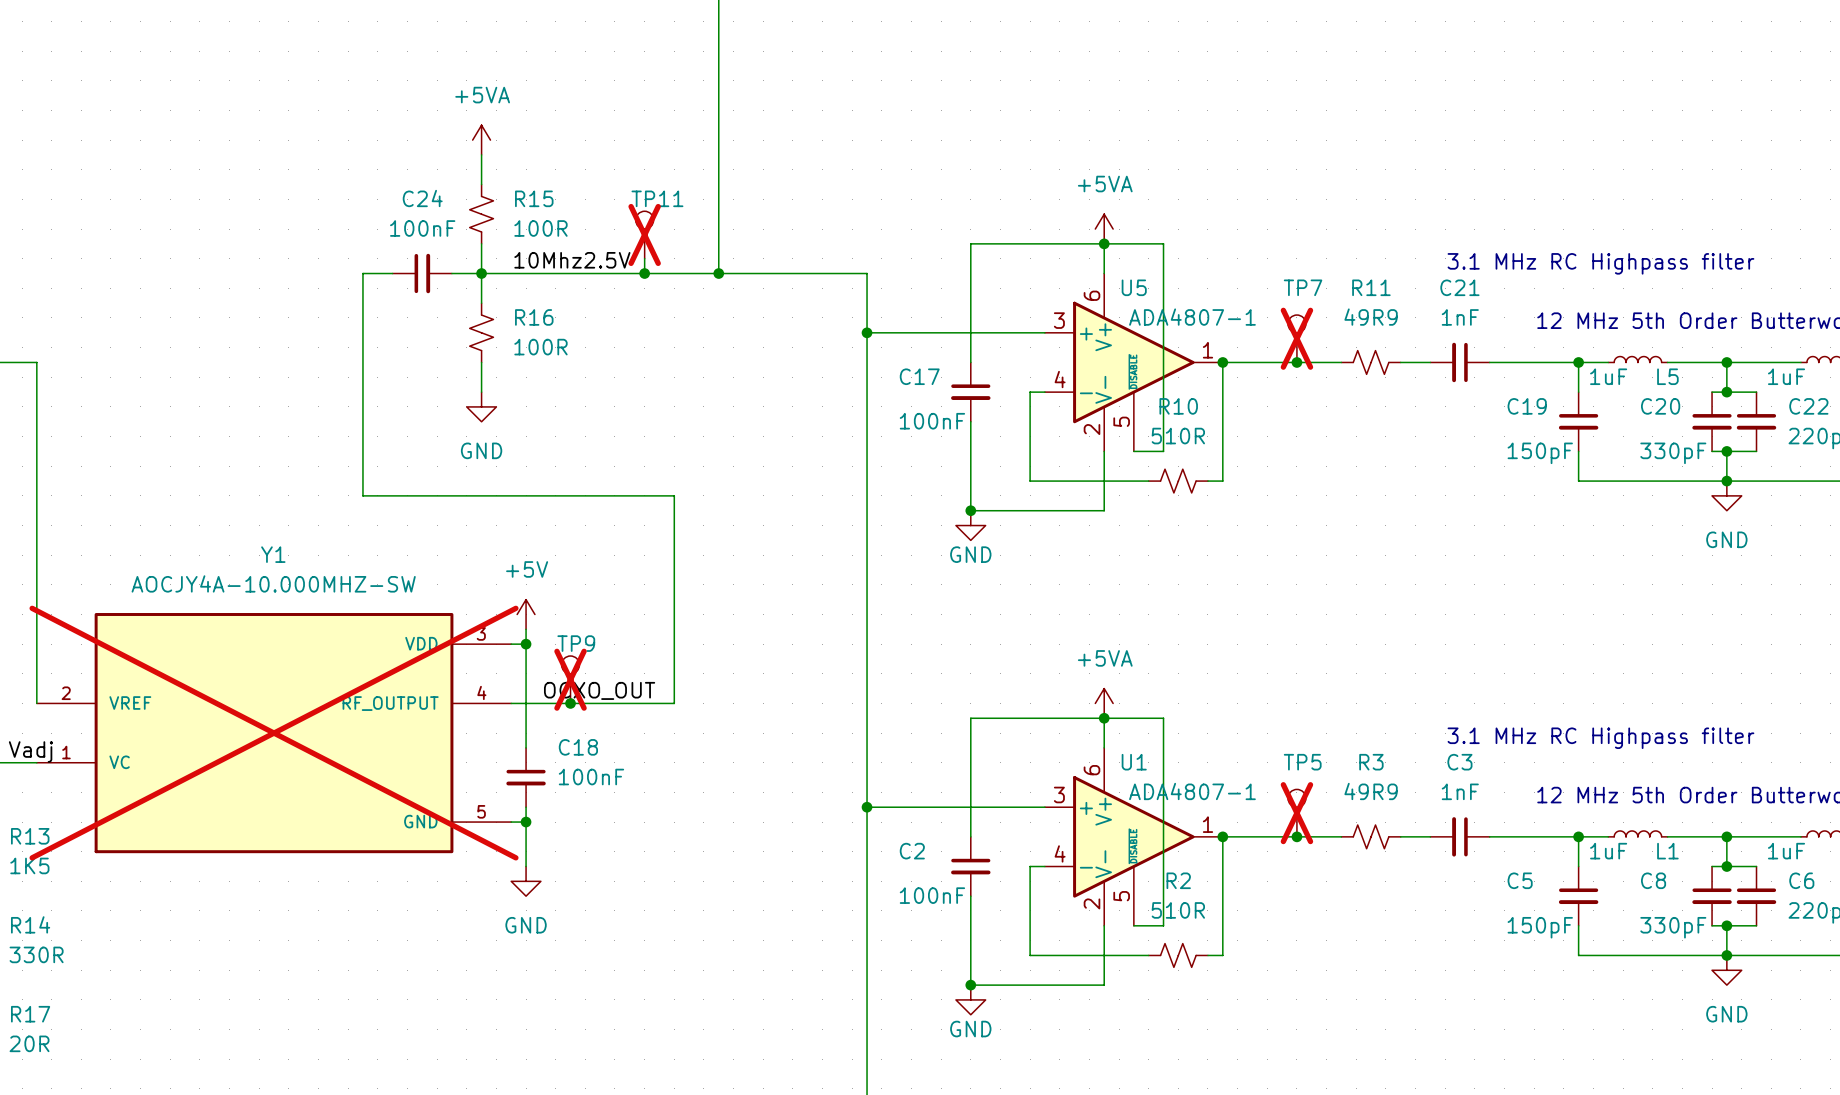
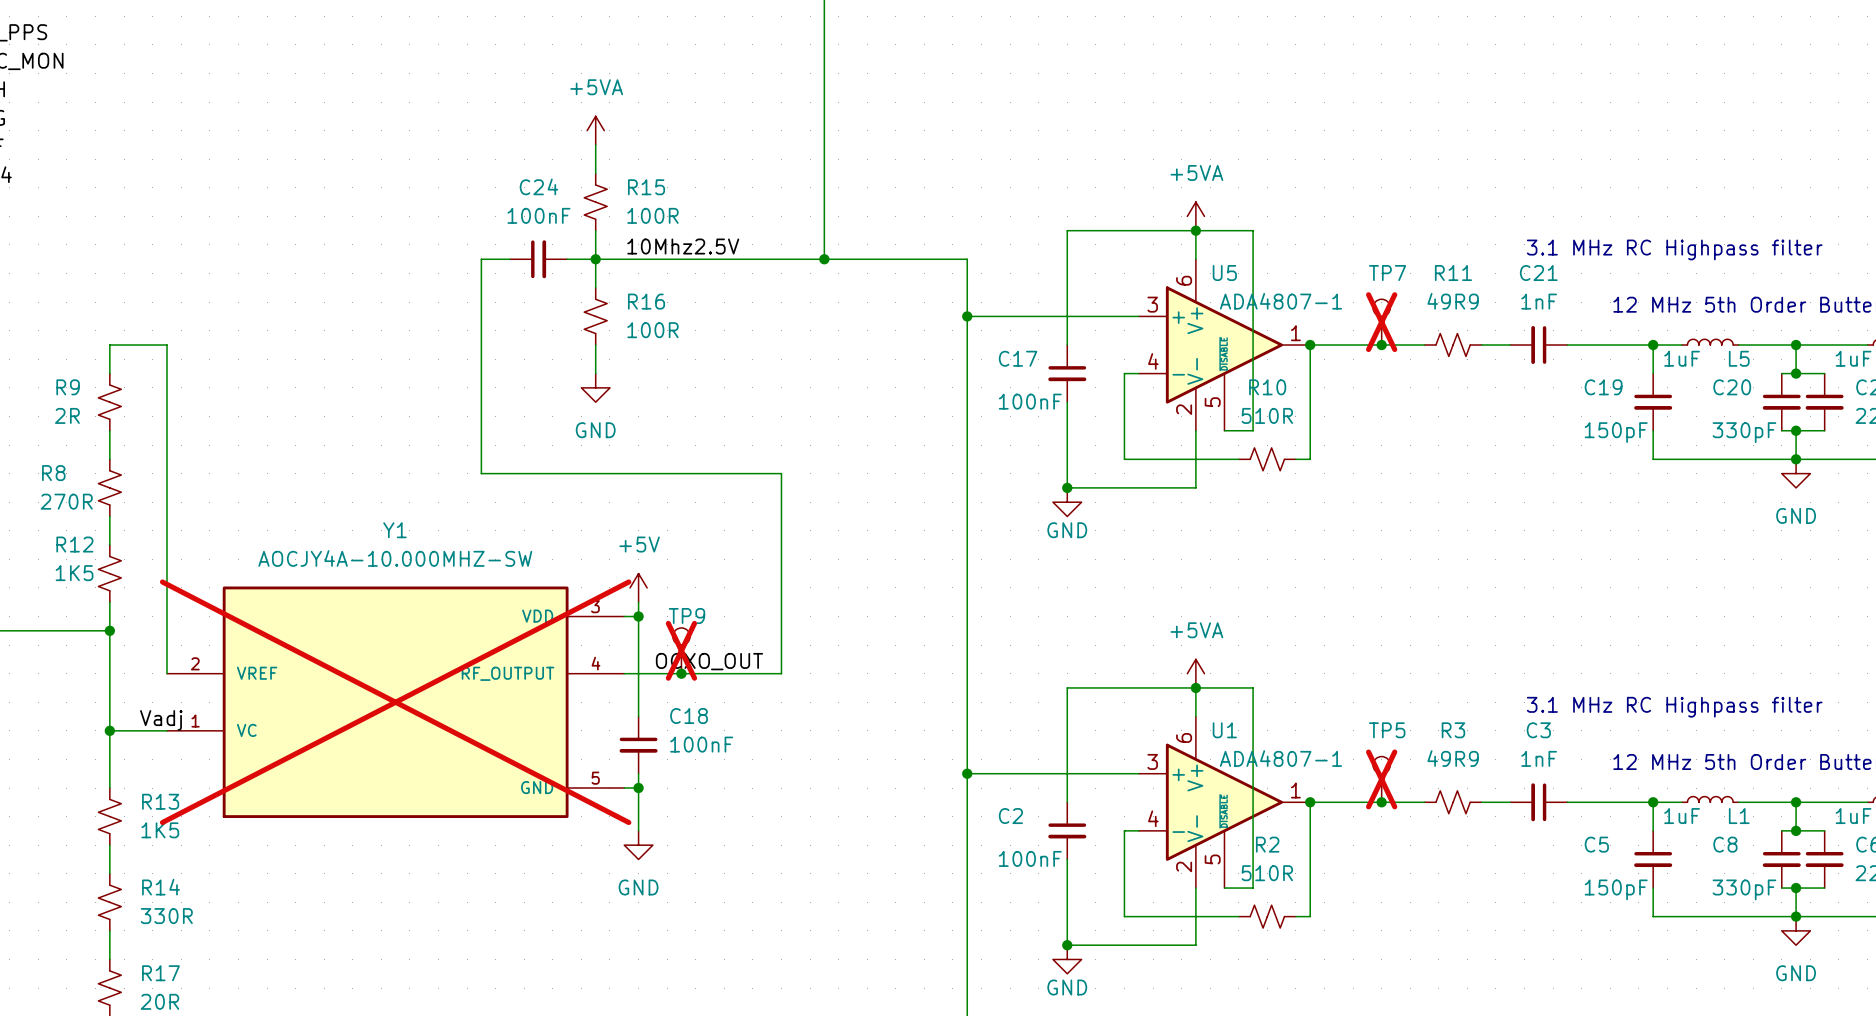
TP11: (644, 234) -> none
wire: (644, 258) (644, 273) -> none
junction: (644, 273) -> none

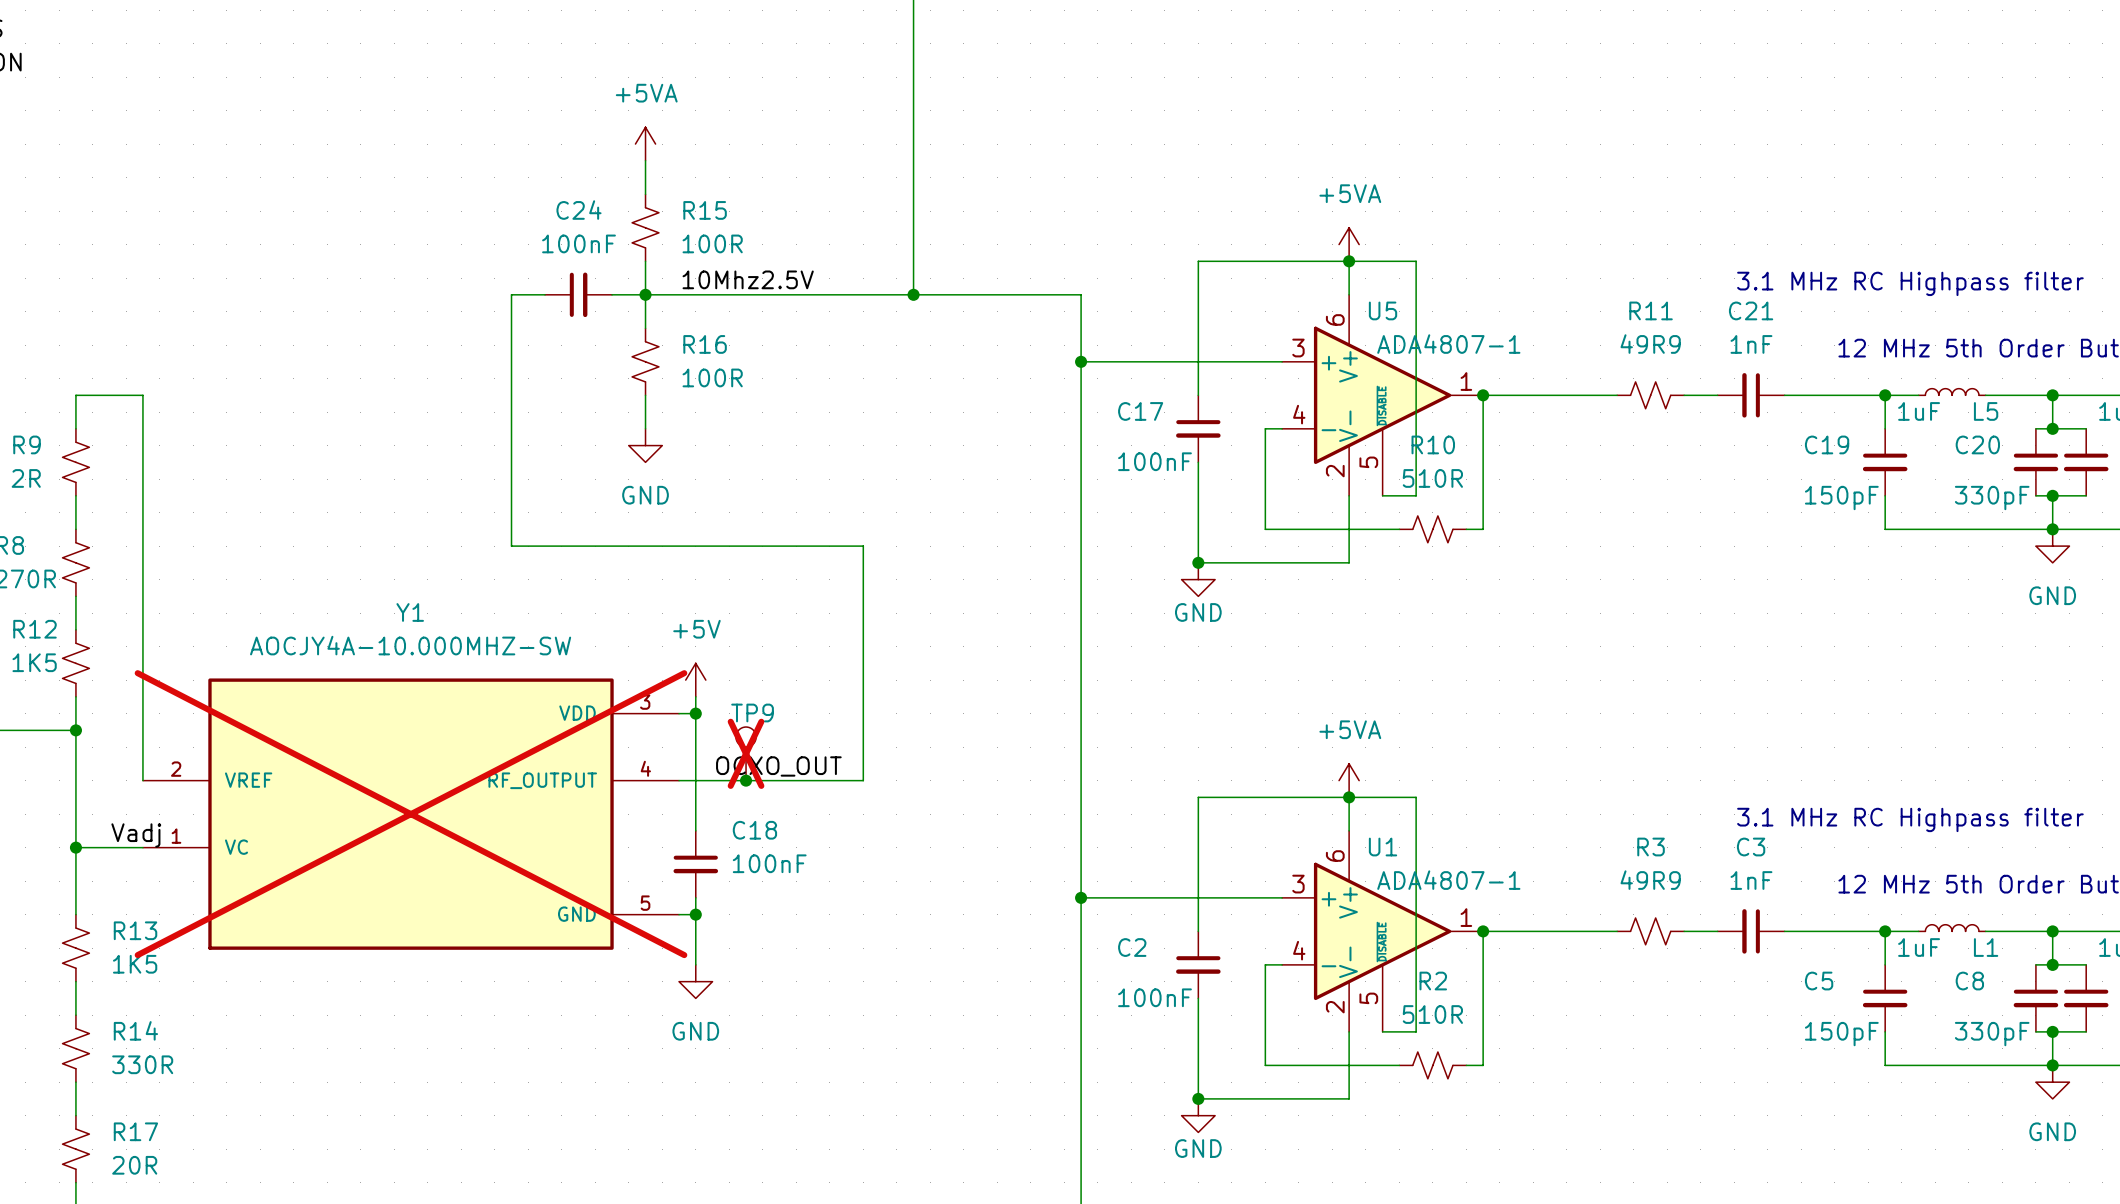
TP7: (1381, 322) -> none
junction: (1381, 345) -> none
TP5: (1381, 779) -> none
junction: (1381, 802) -> none

